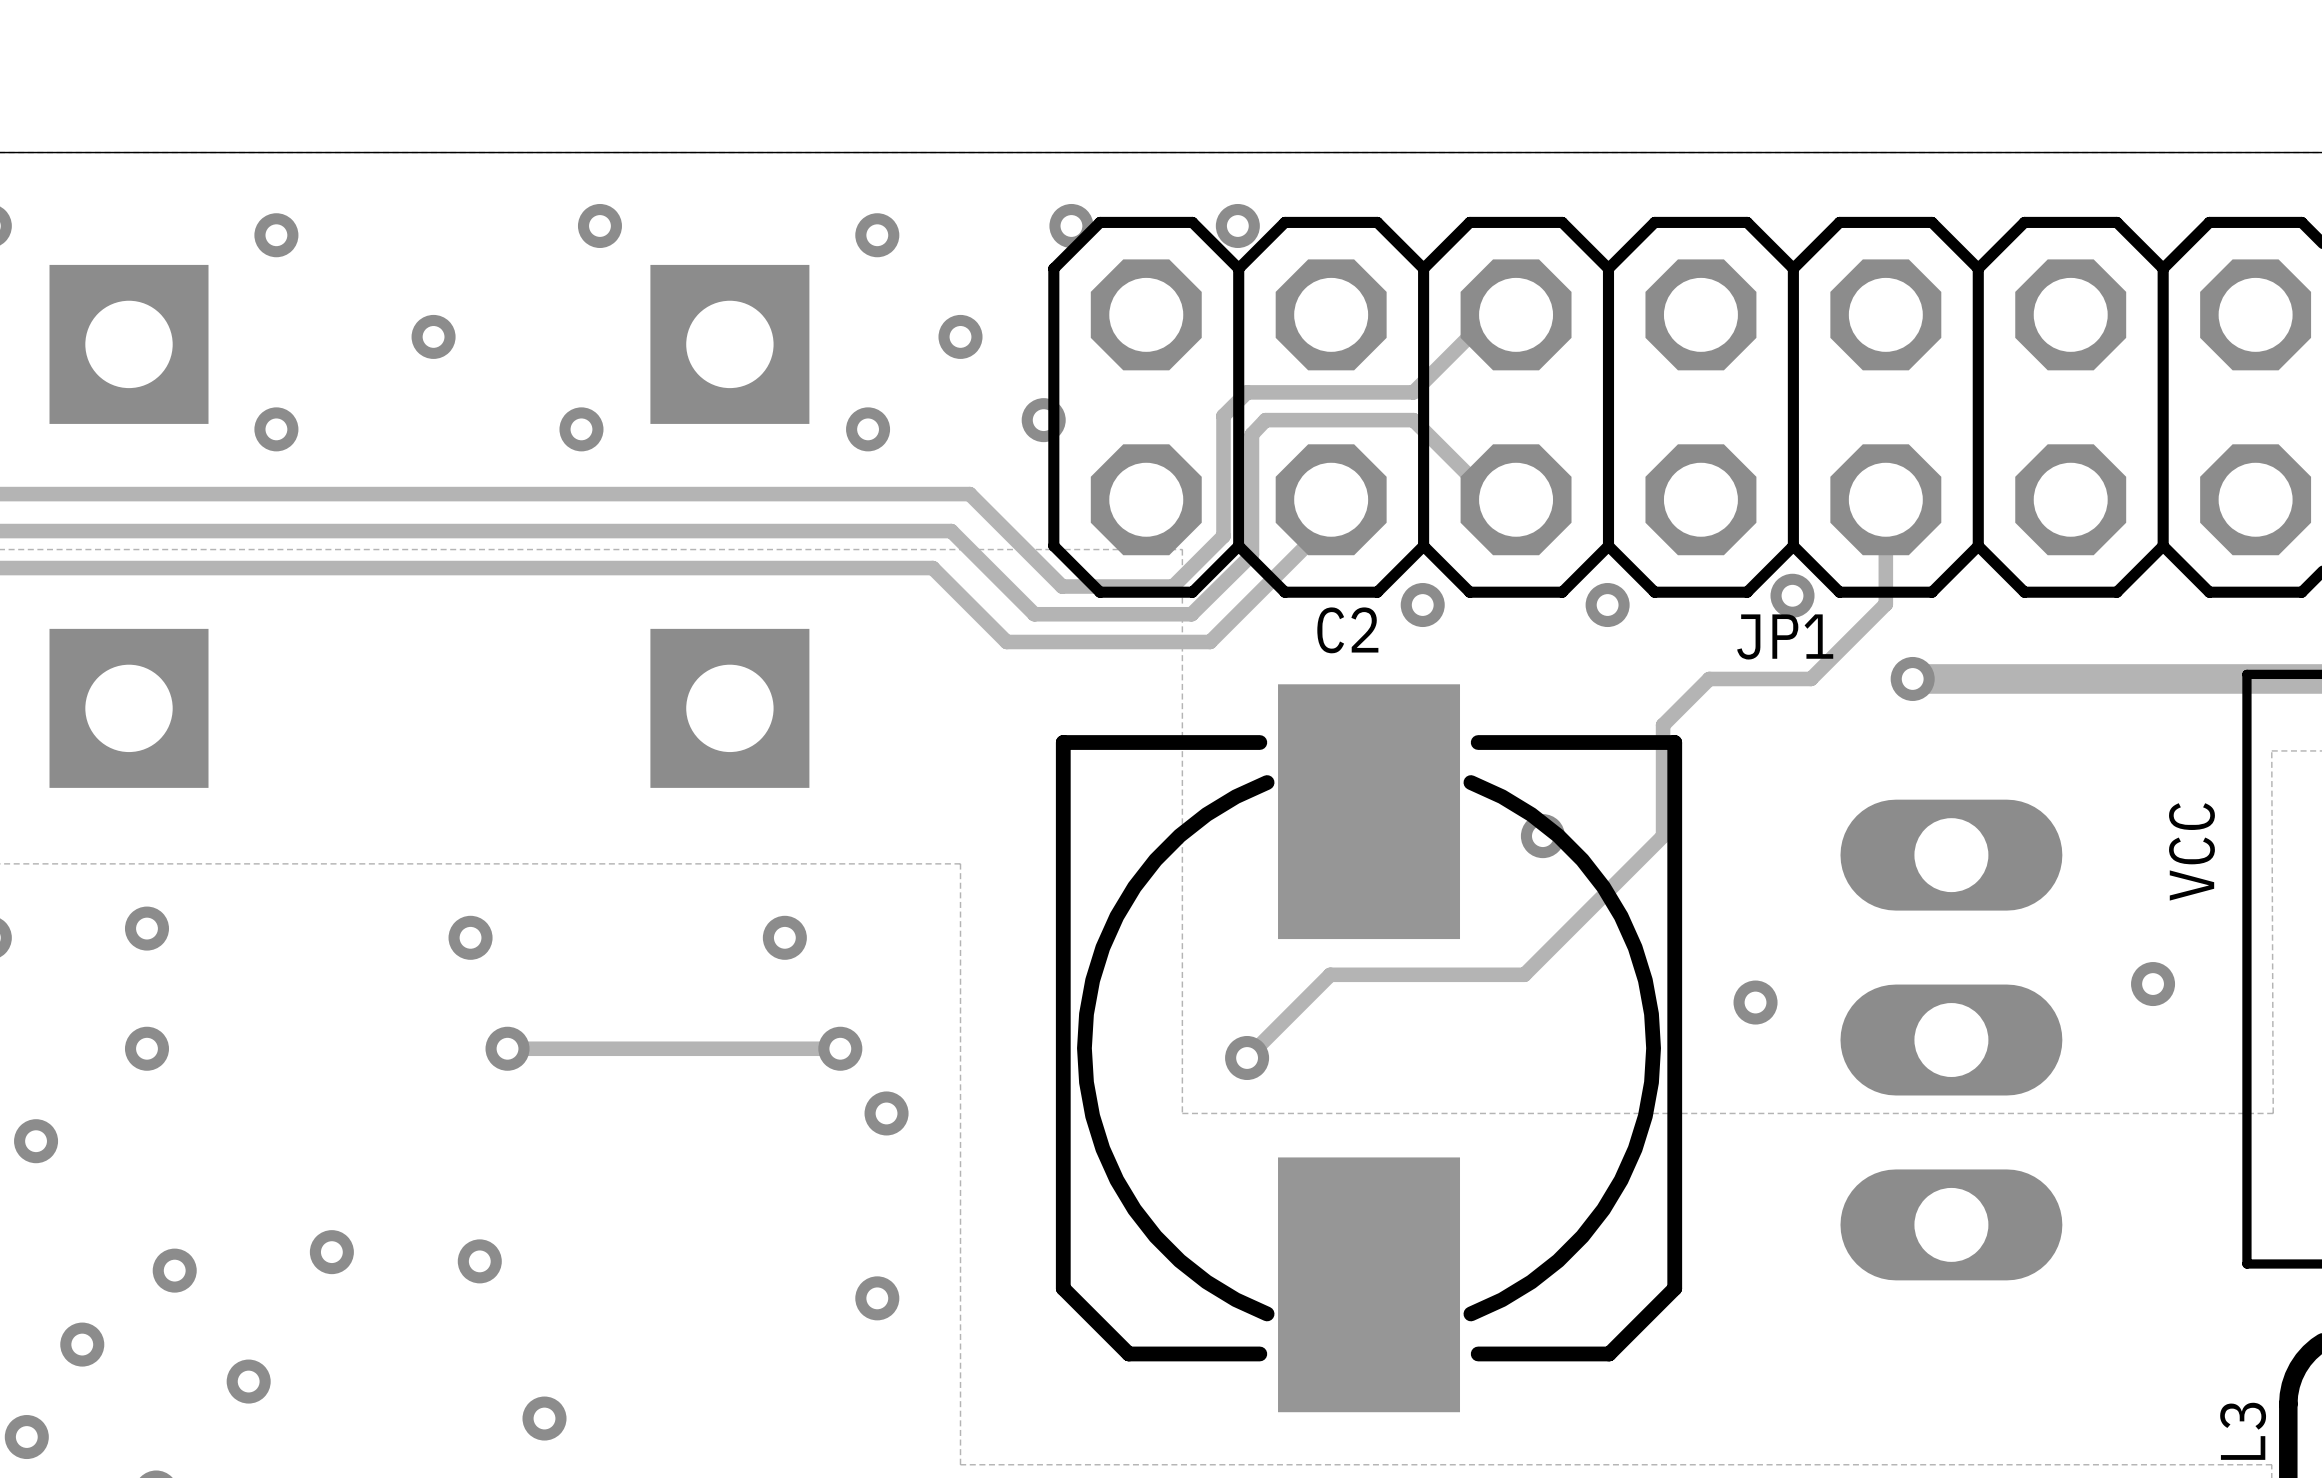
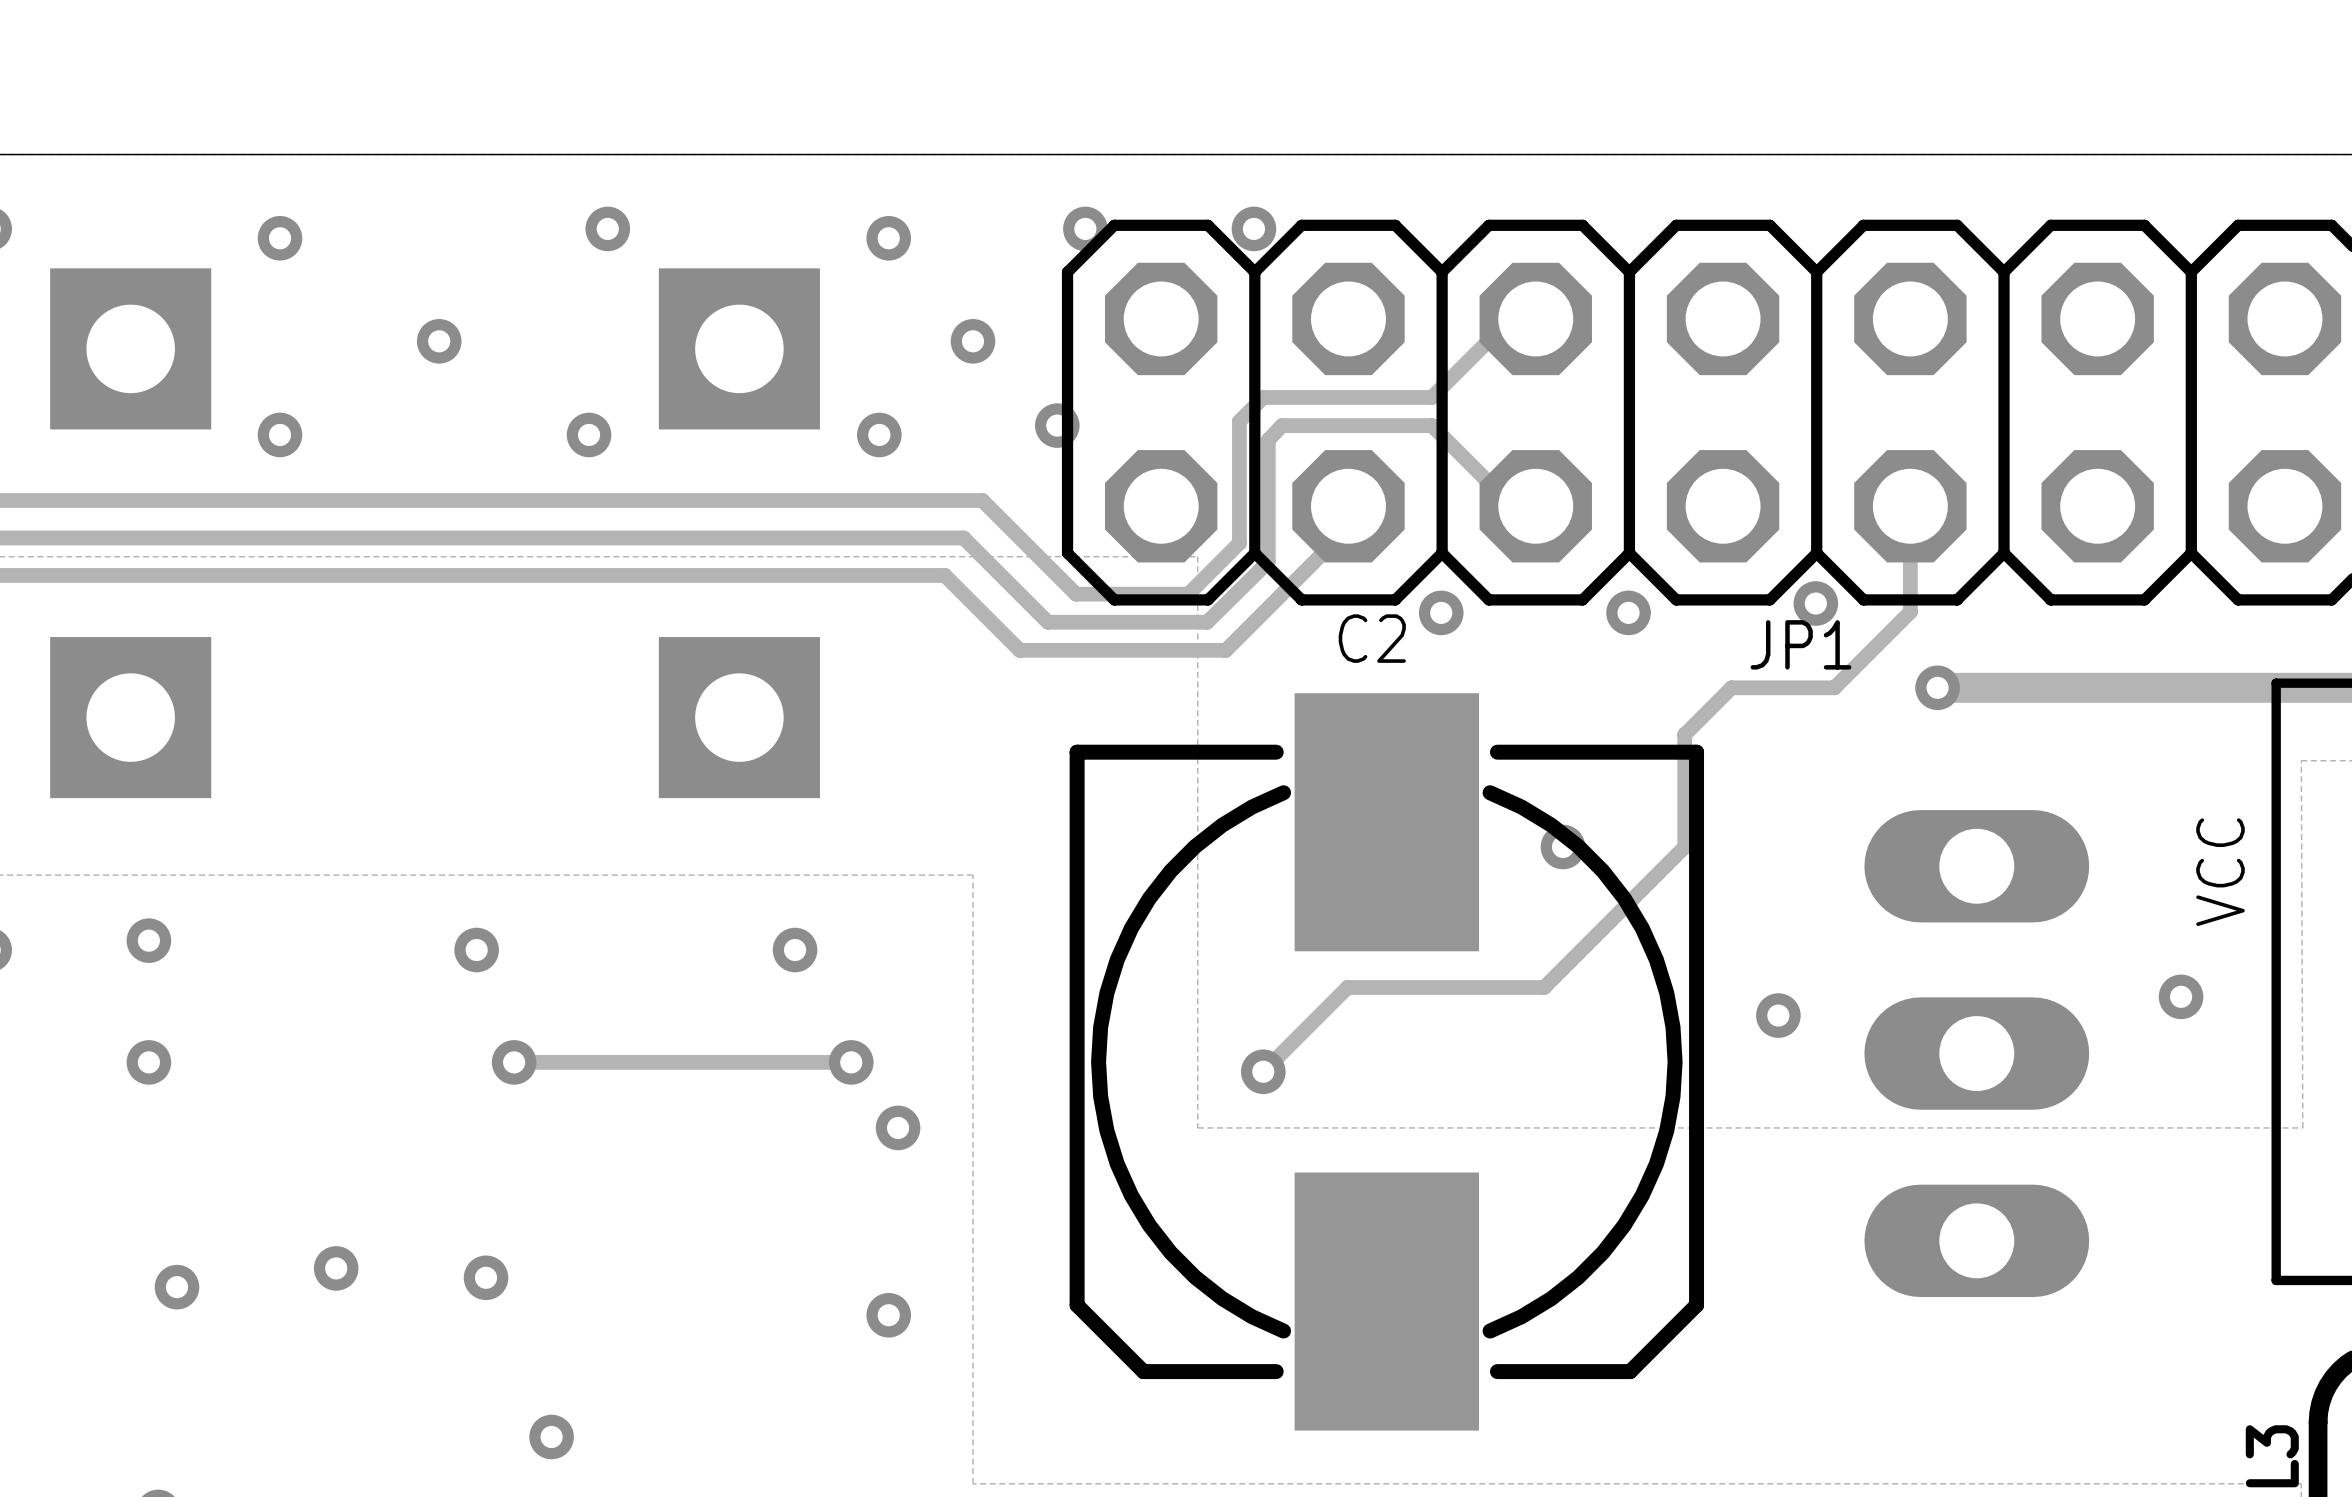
via: (36, 1141) -> none
via: (82, 1344) -> none
via: (248, 1381) -> none
via: (26, 1437) -> none

